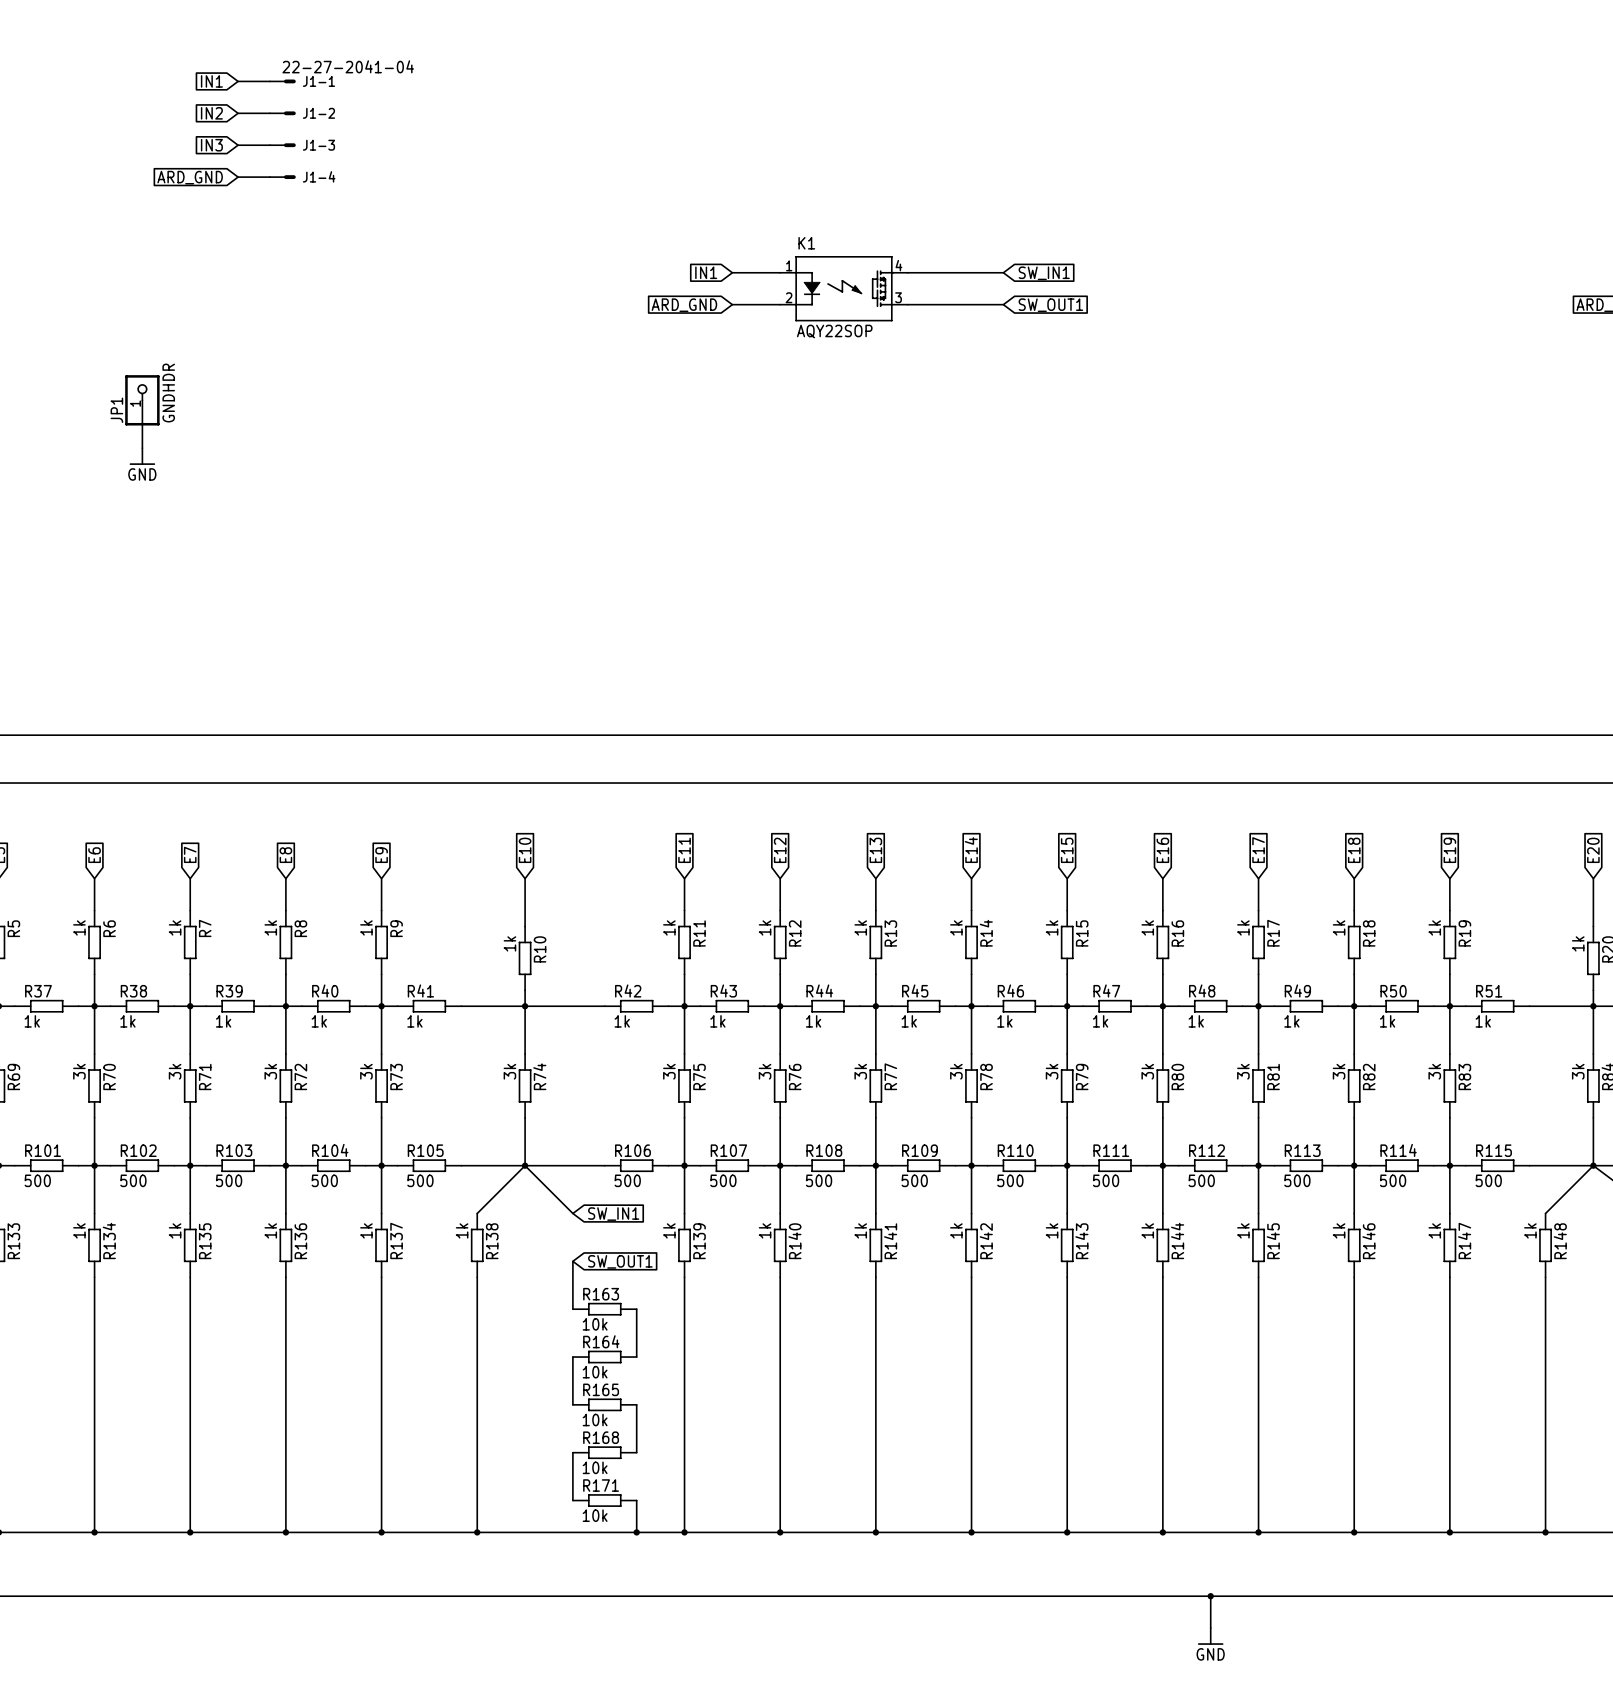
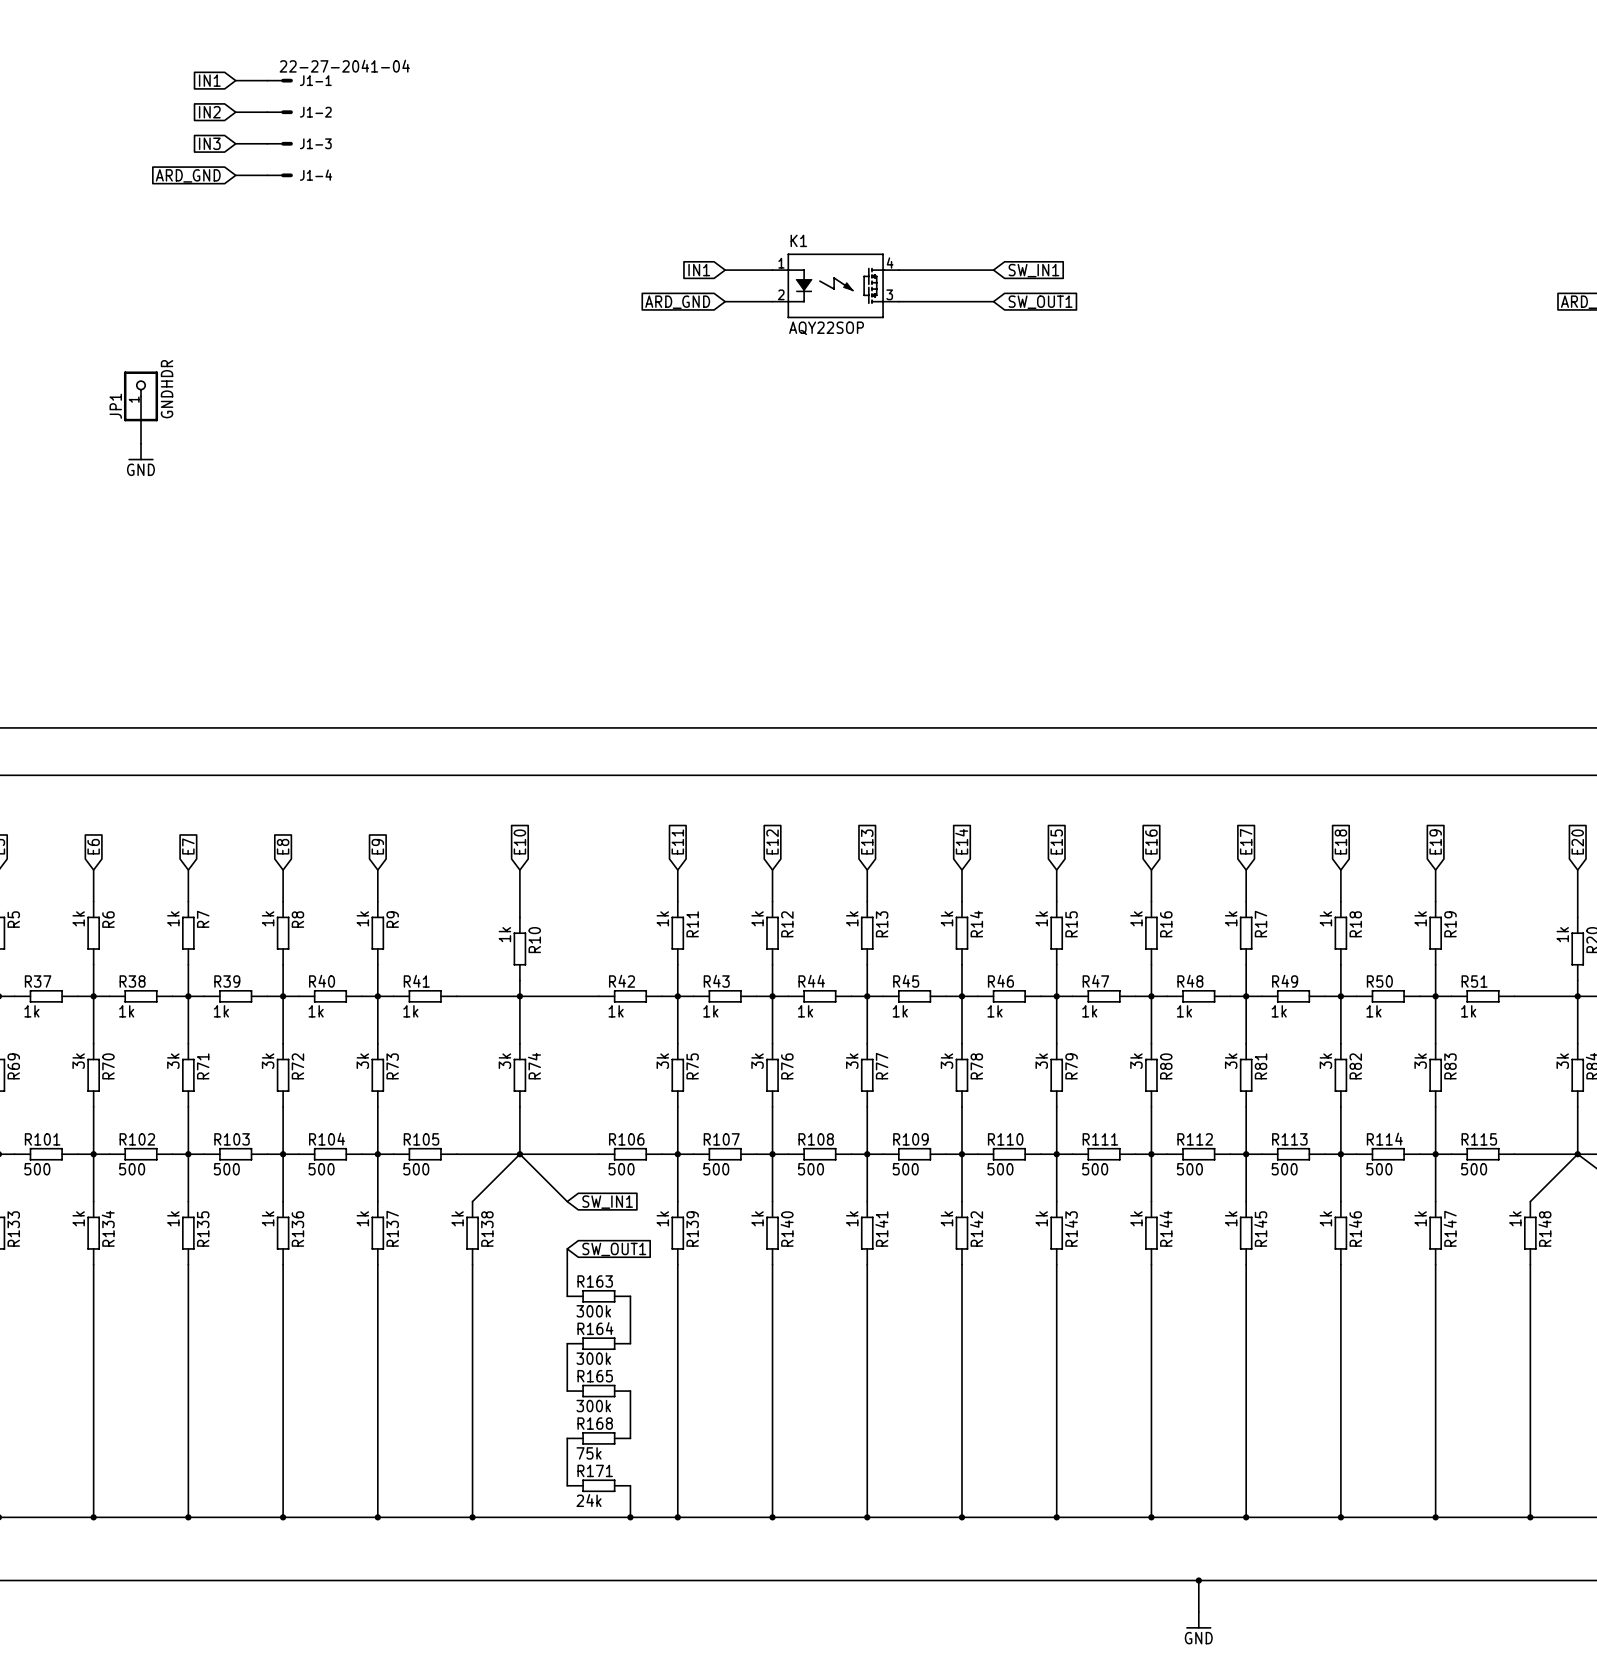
R163 value: 10k (595, 1324) -> 300k (593, 1311)
R164 value: 10k (595, 1372) -> 300k (593, 1358)
R165 value: 10k (595, 1420) -> 300k (593, 1406)
R168 value: 10k (595, 1467) -> 75k (589, 1453)
R171 value: 10k (595, 1515) -> 24k (589, 1500)

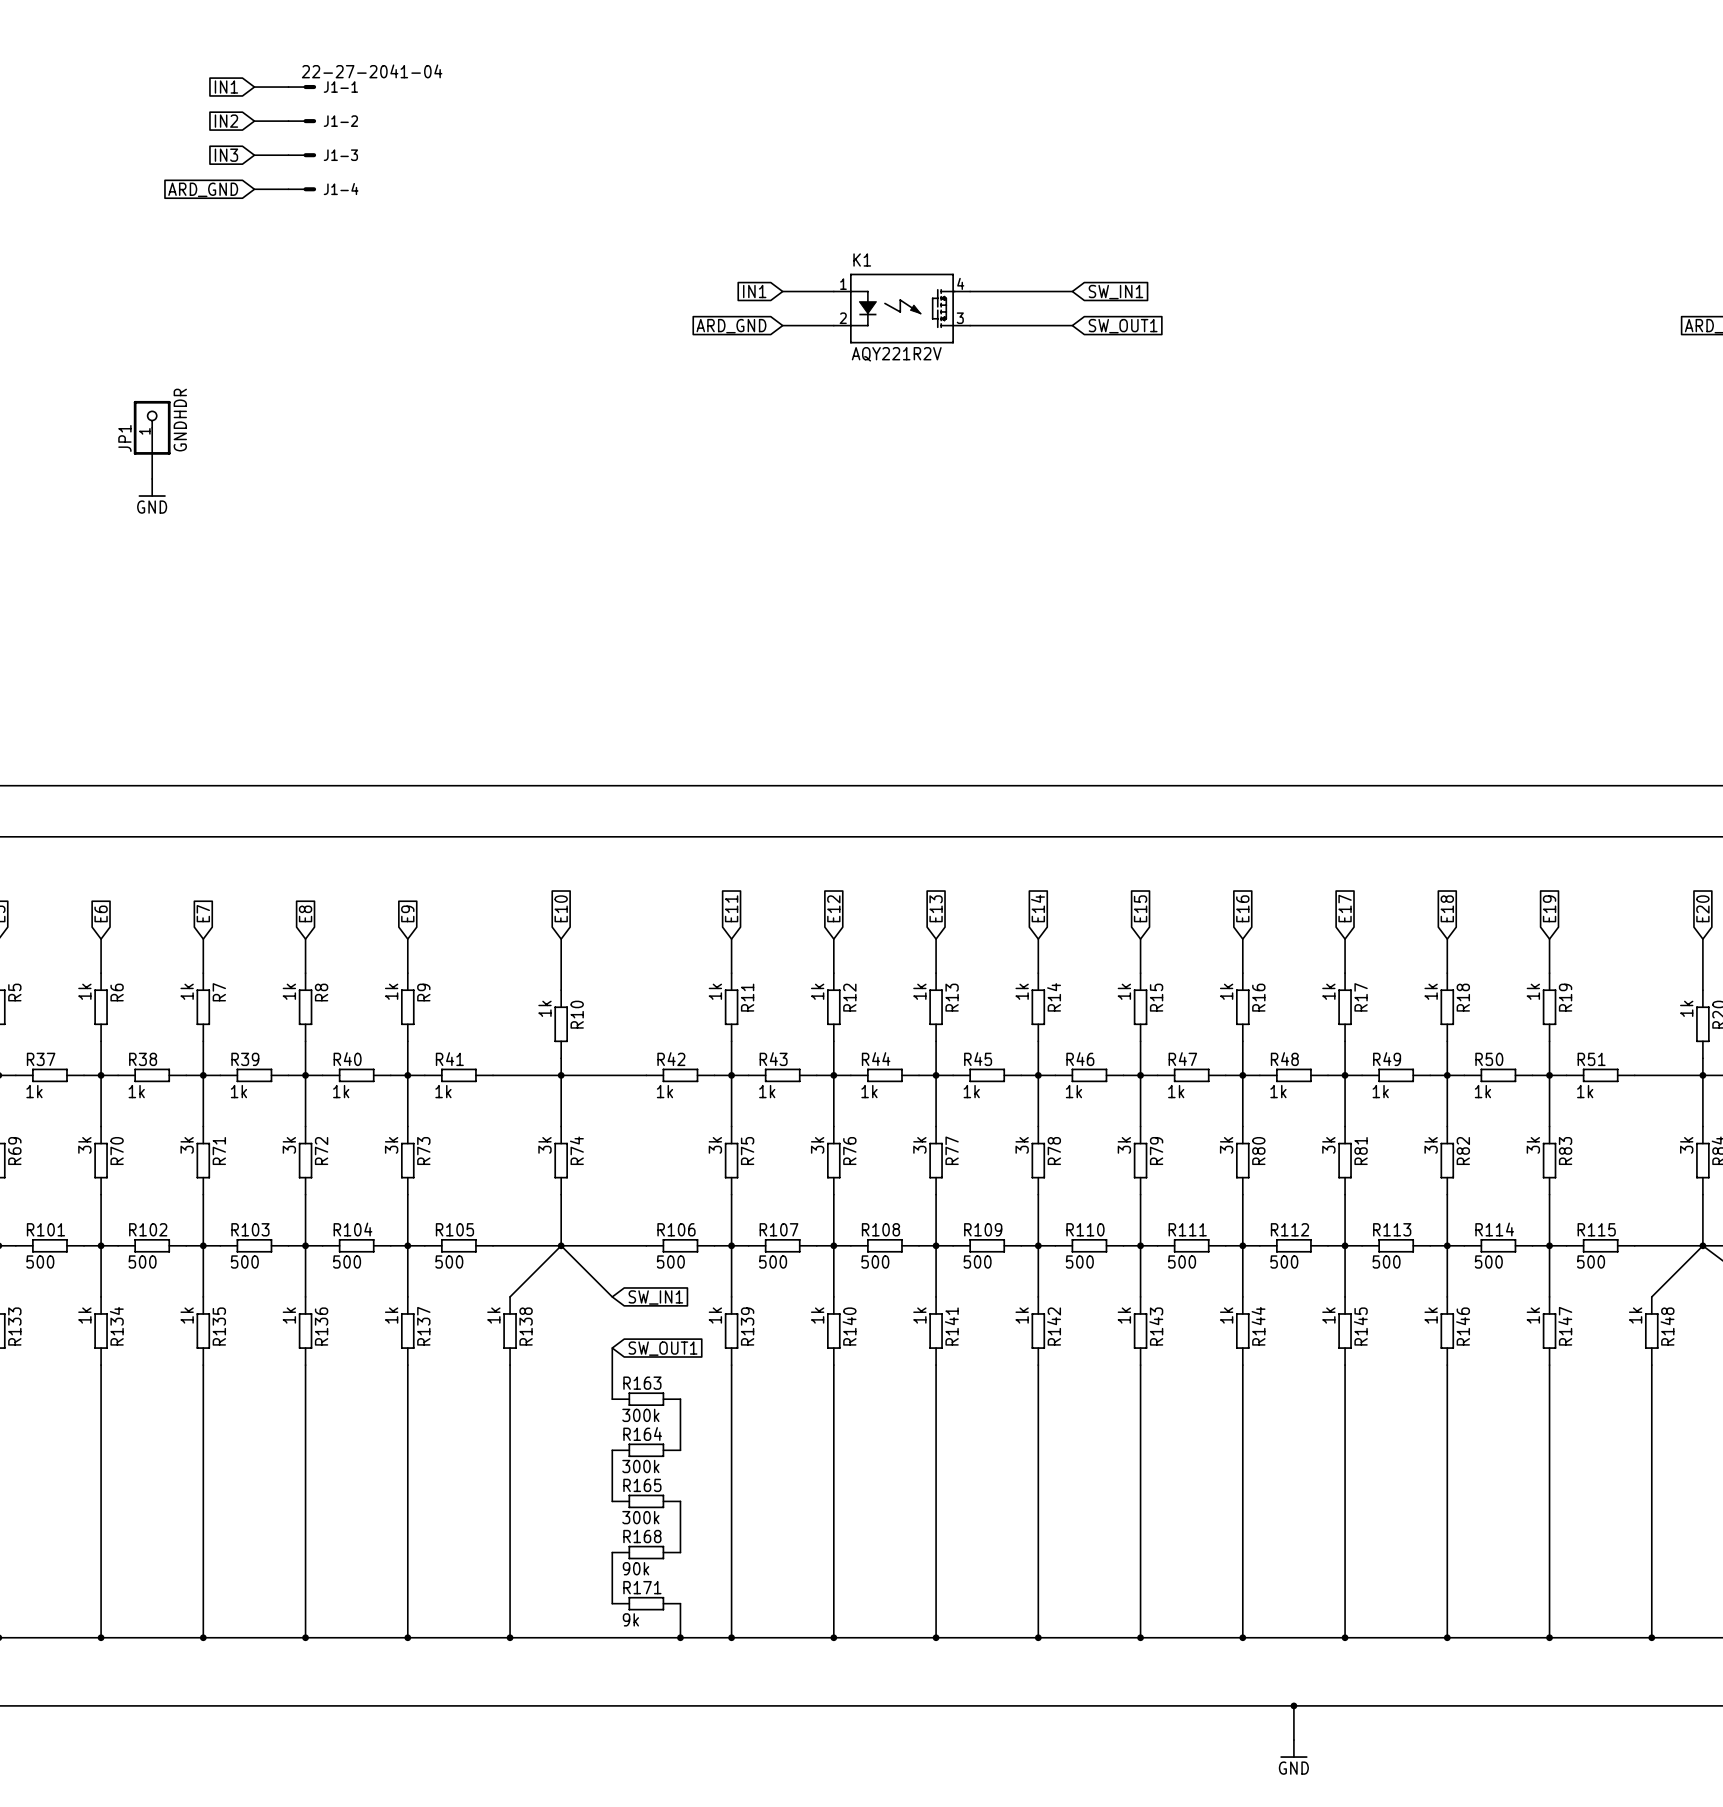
K1 value: AQY22SOP (826, 328) -> AQY221R2V (896, 354)
R168 value: 75k (589, 1453) -> 90k (636, 1568)
R171 value: 24k (589, 1500) -> 9k (630, 1619)

